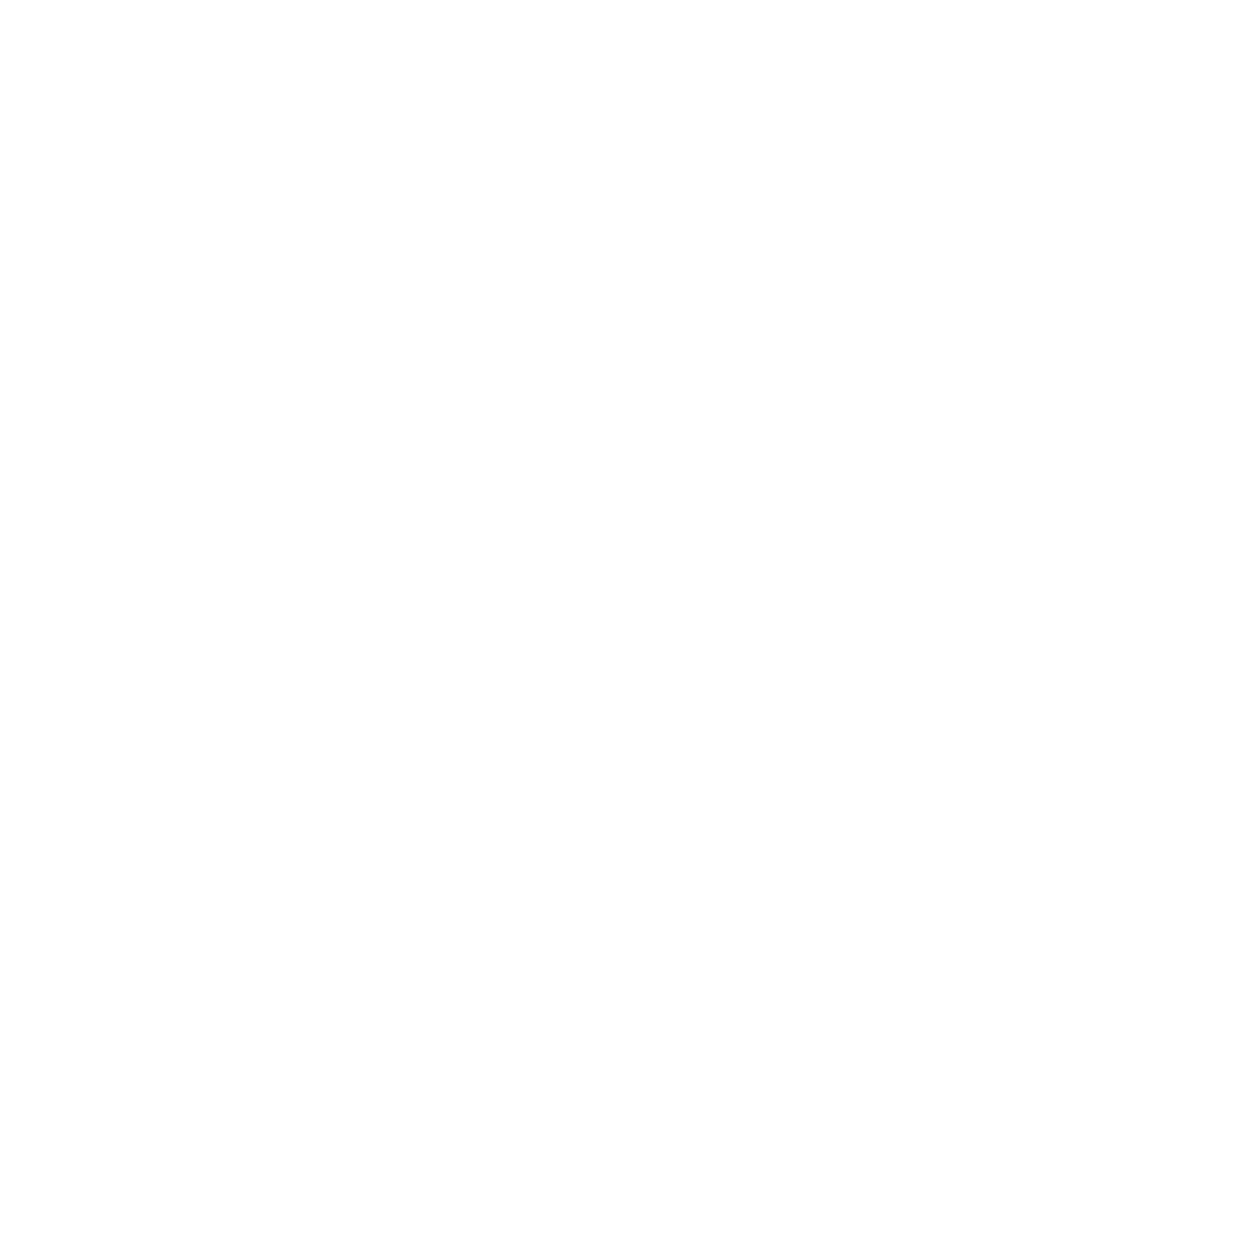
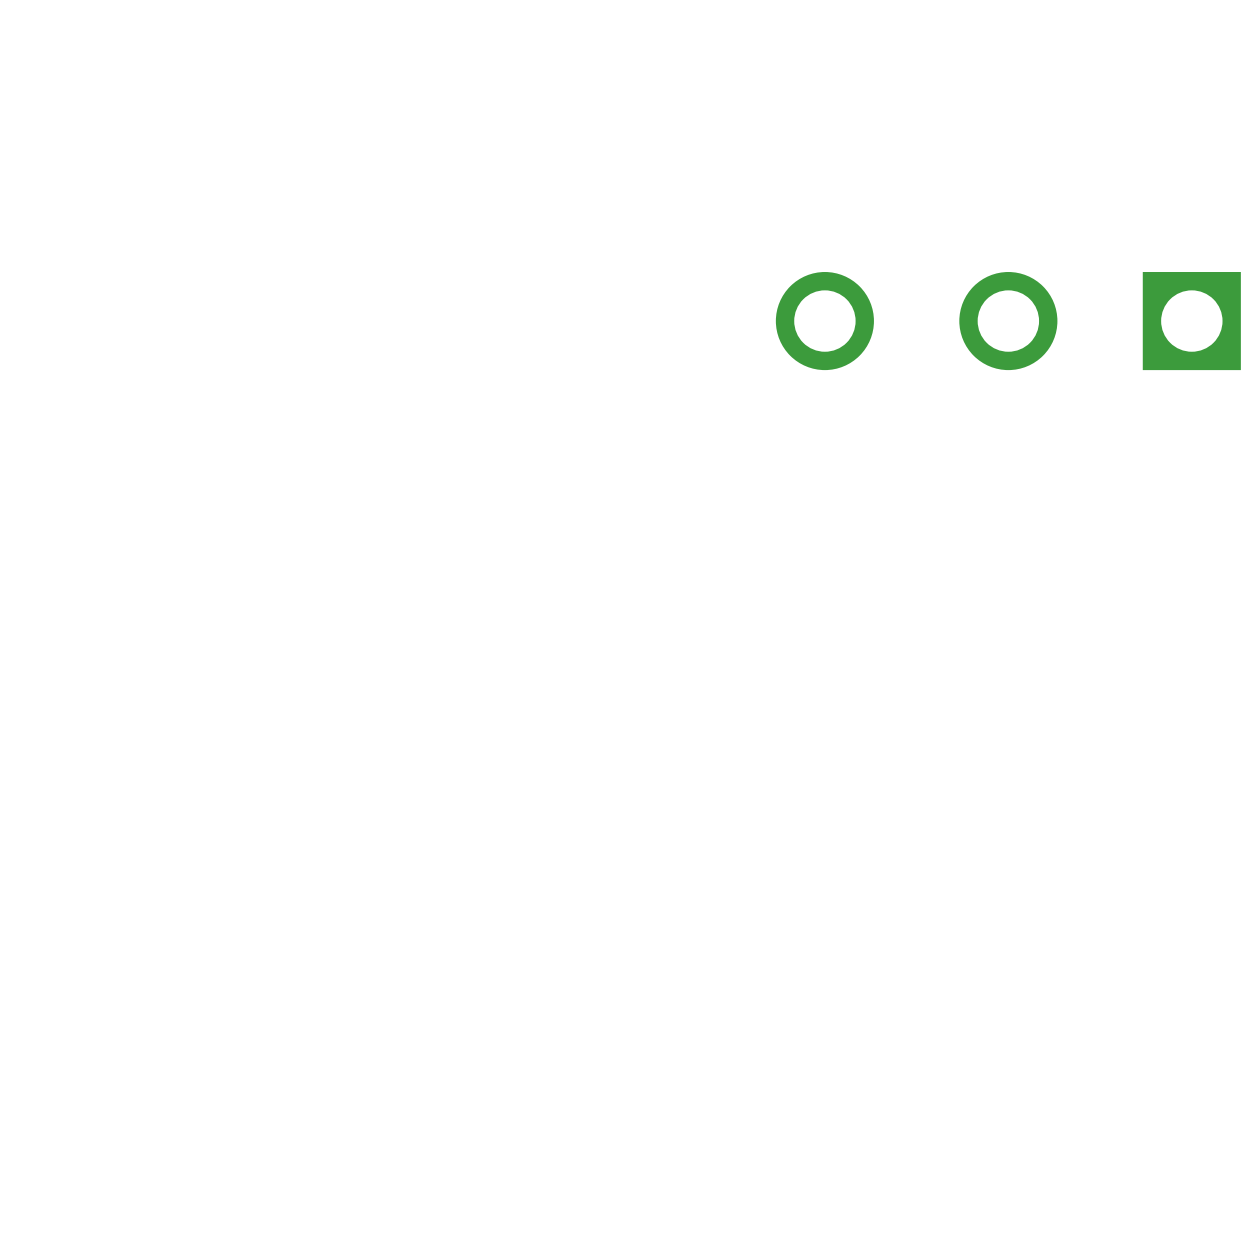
part: none -> (1008, 321)

